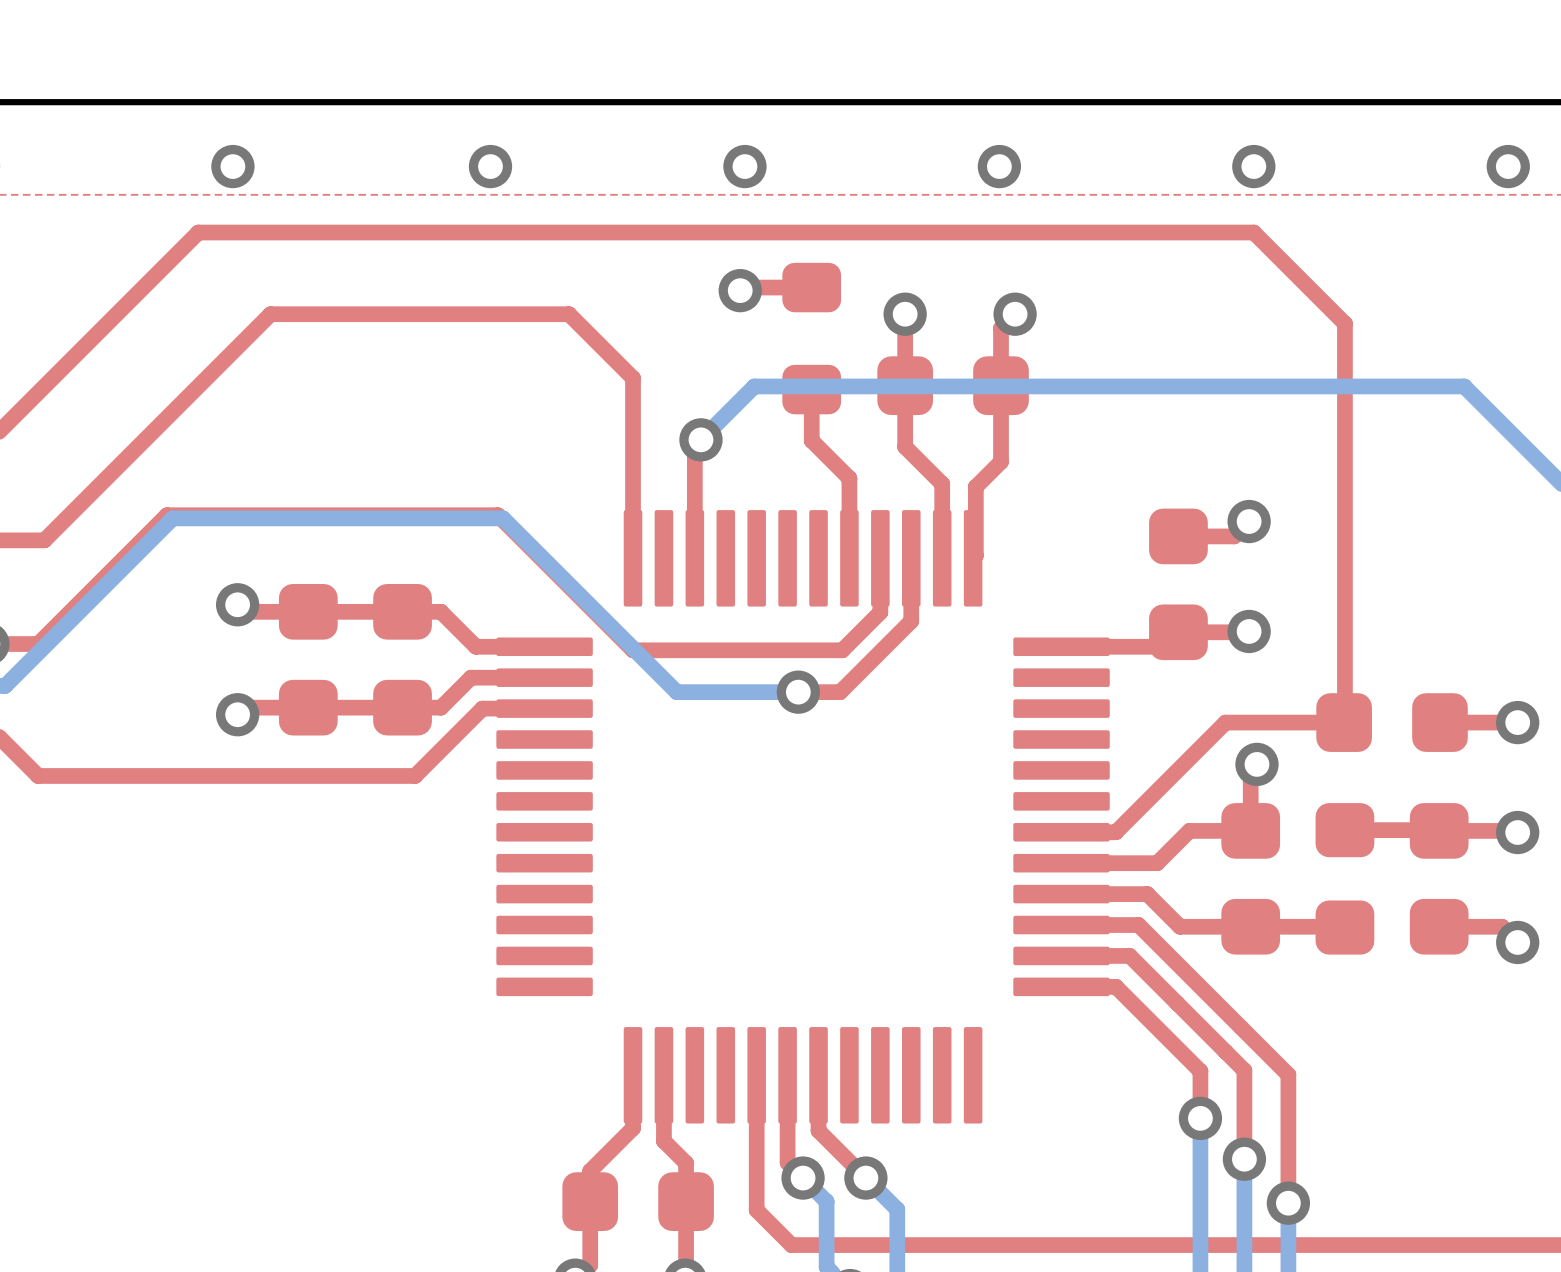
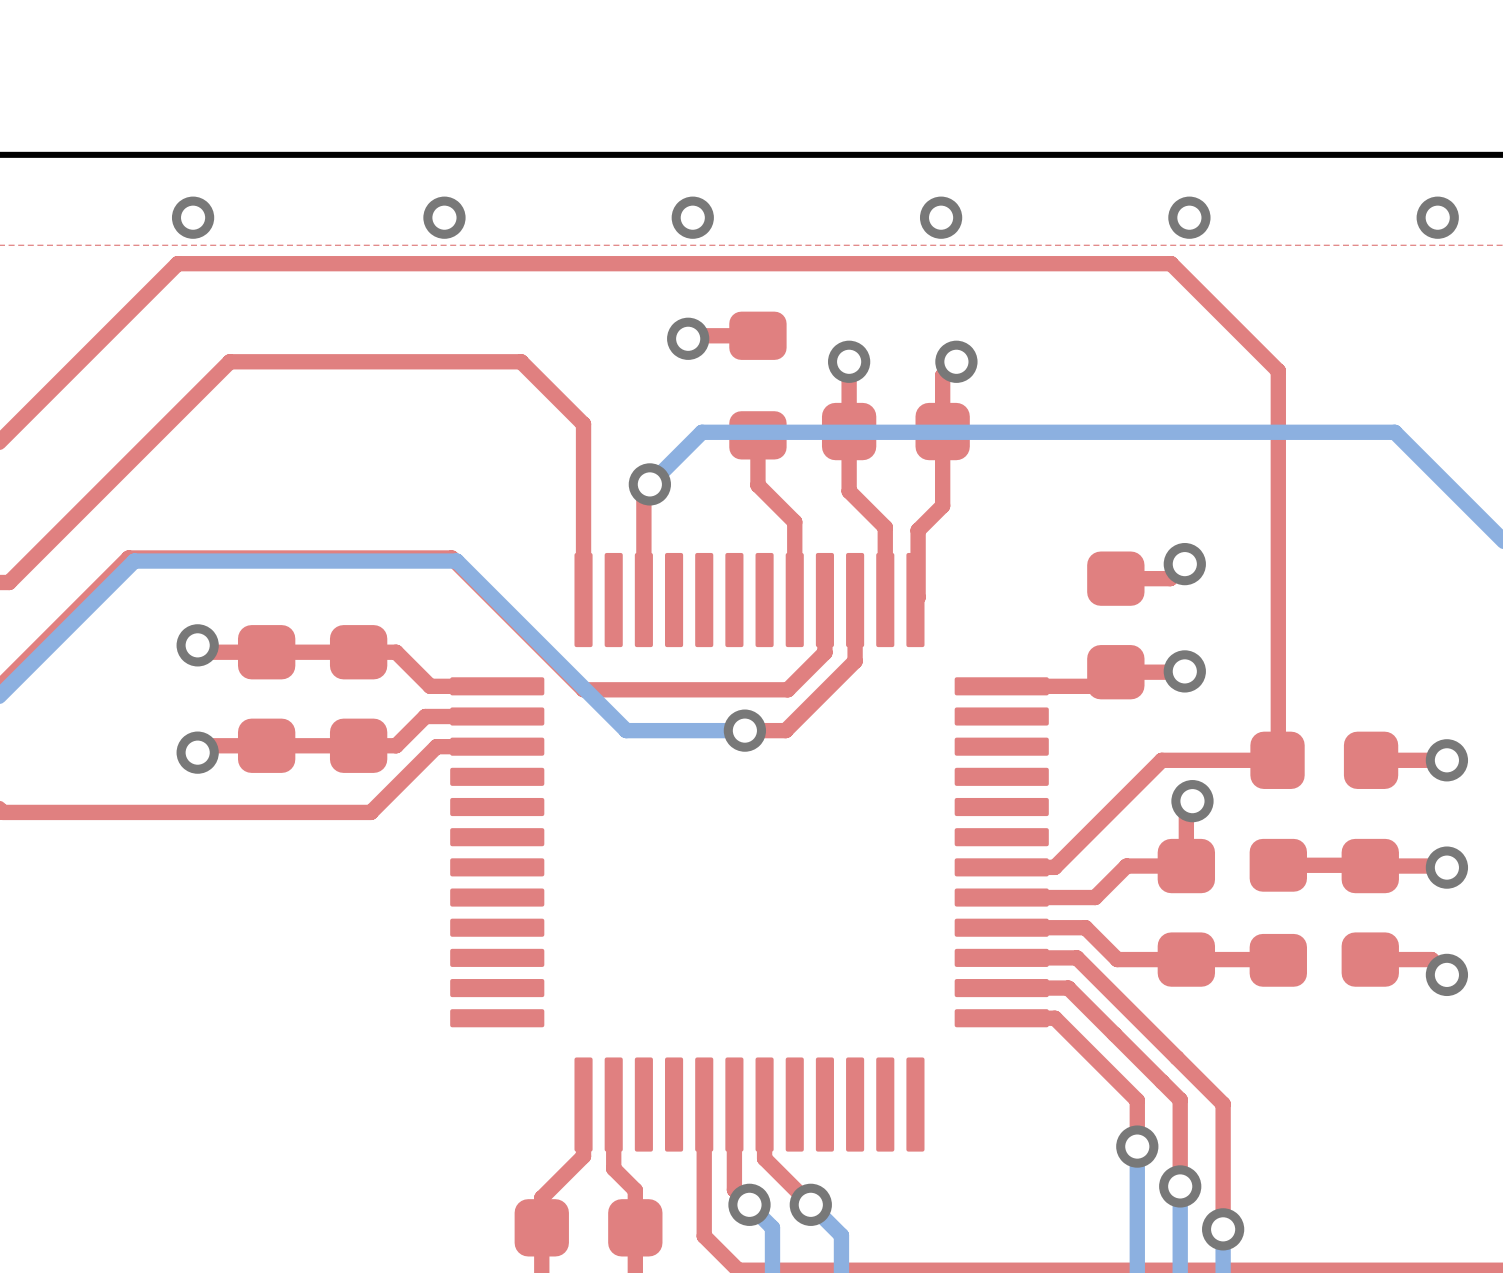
top track: (1253, 232) (198, 232) -> (1189, 282) (1171, 263) (177, 263) (159, 282)

